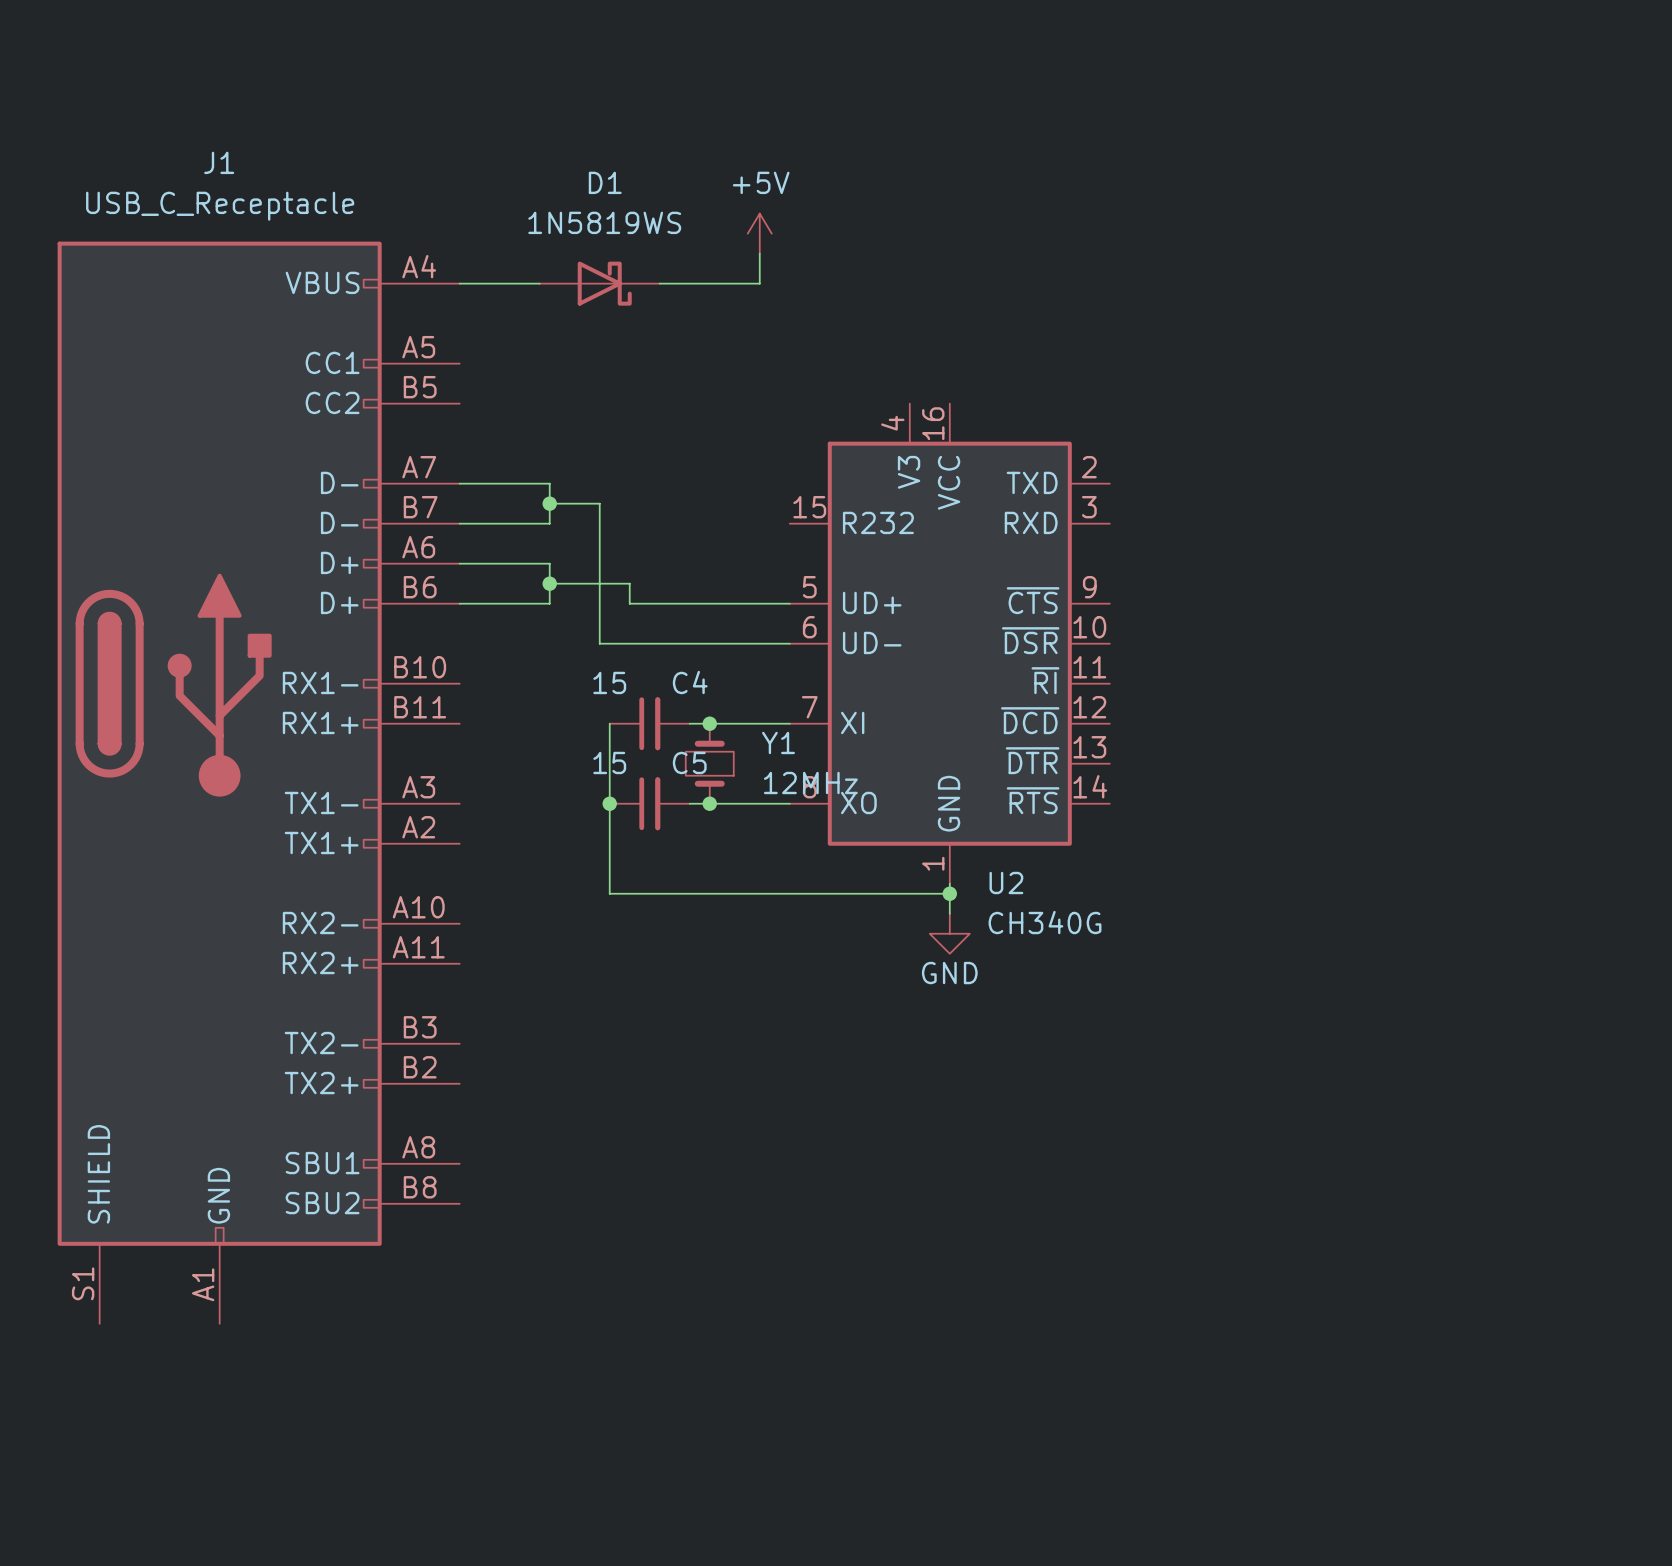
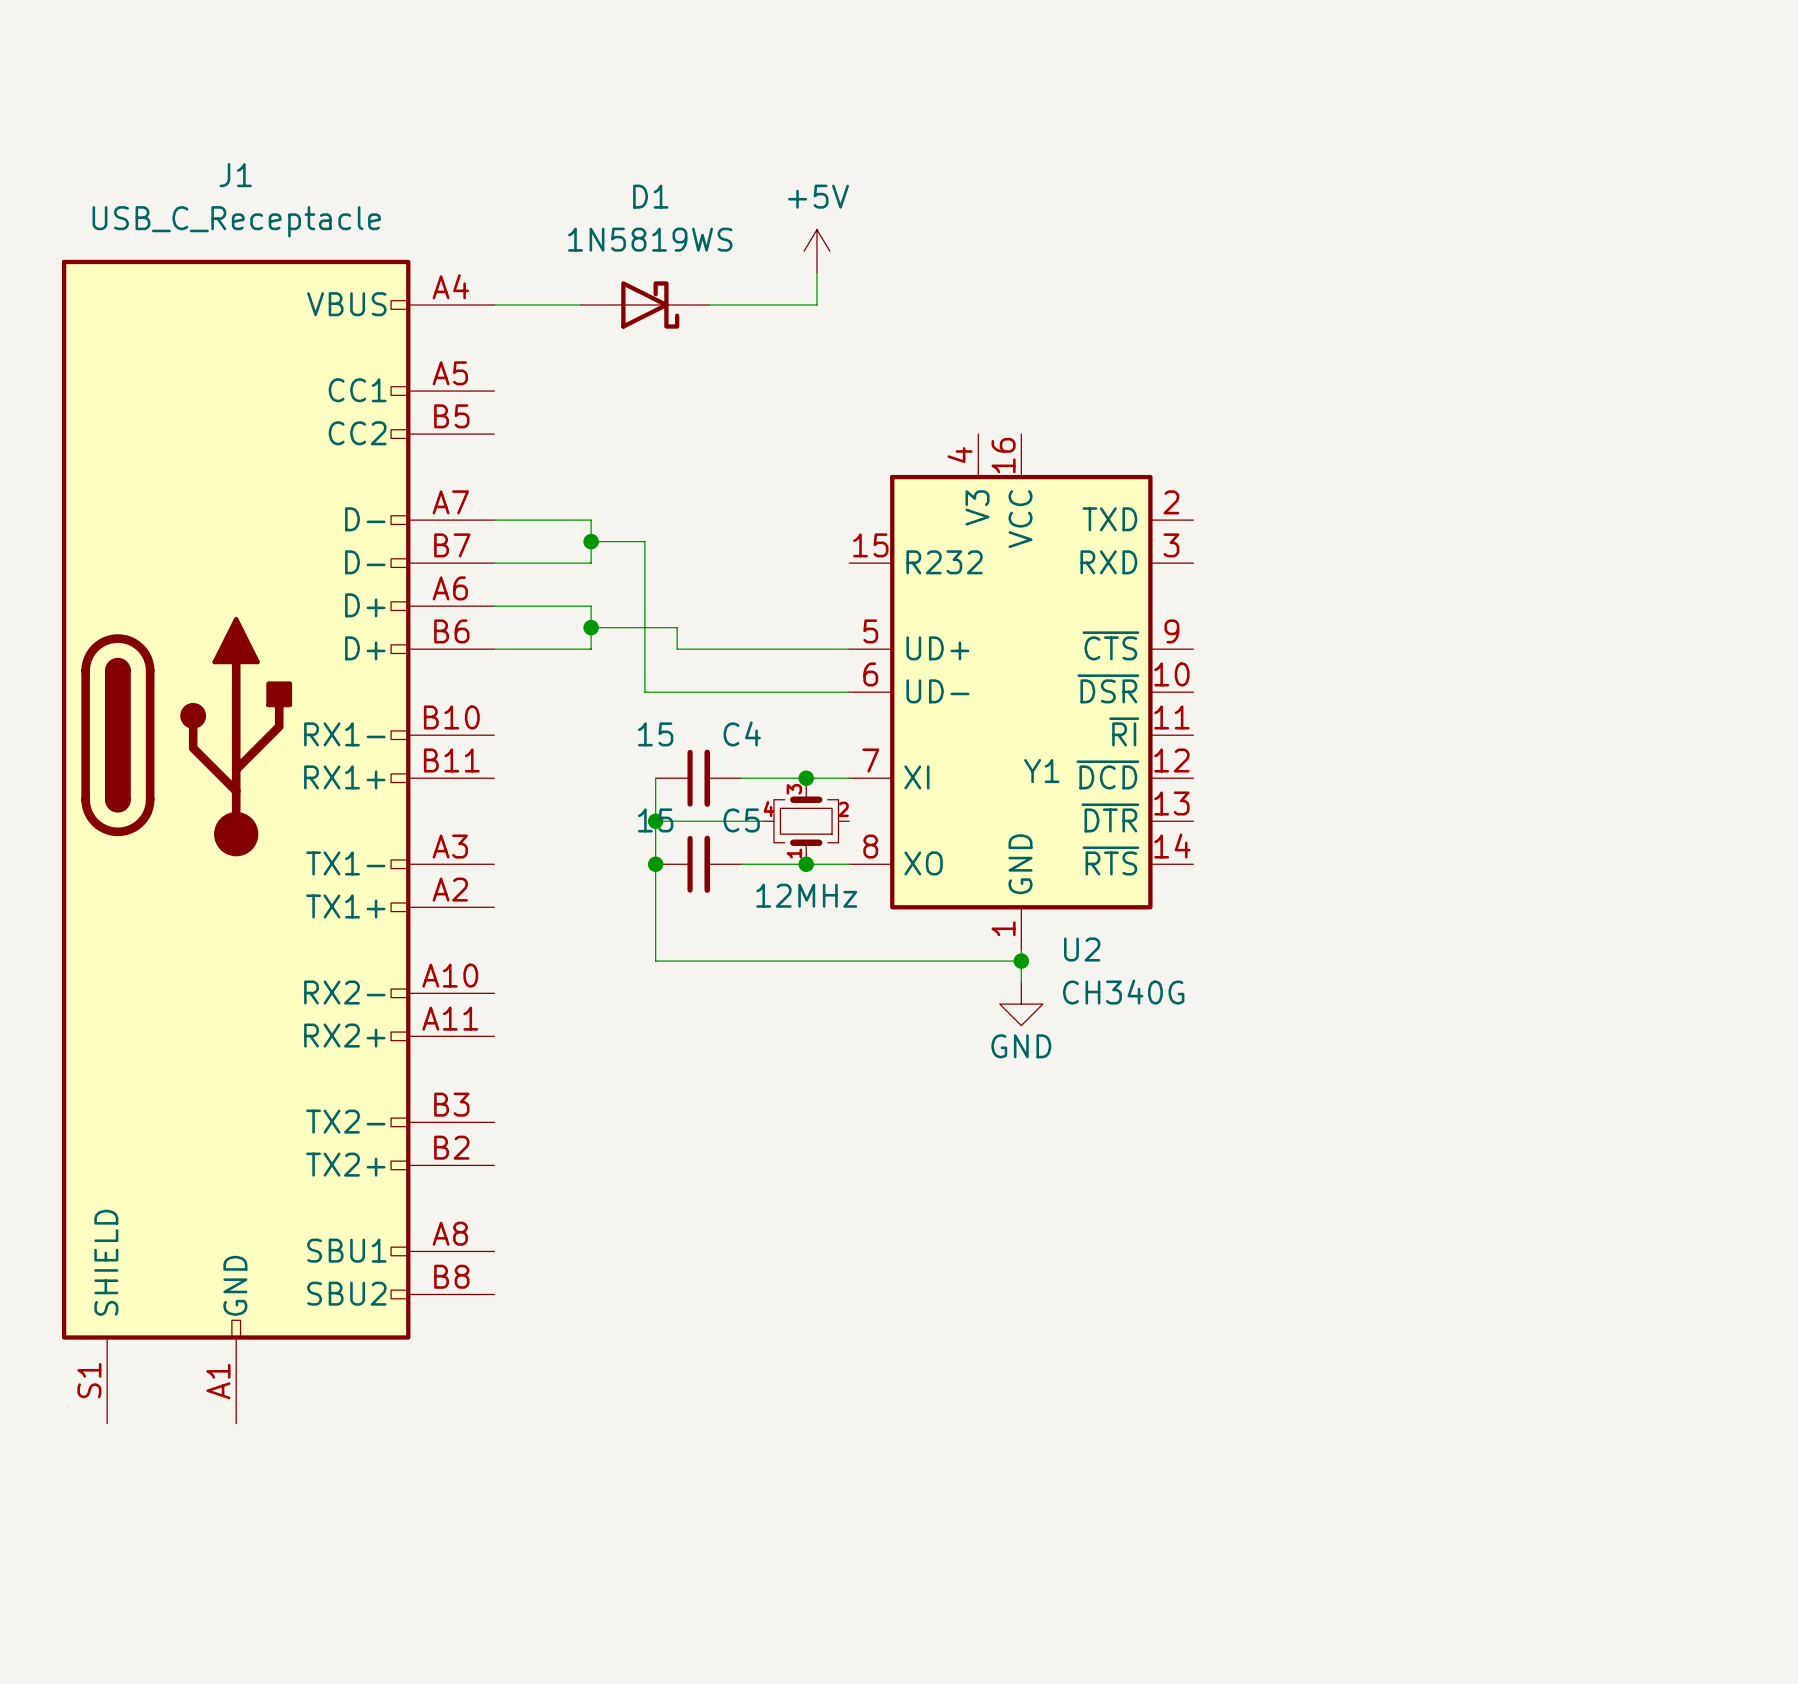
Y1 symbol: [685, 723, 734, 804] -> [763, 778, 850, 865]
junction position: (709, 723) -> (806, 778)
Y1 name position: Y1 (778, 742) -> Y1 (1041, 771)
wire: none -> (655, 821) (763, 821)
junction: none -> (655, 821)
Y1 value position: 12MHz (810, 782) -> 12MHz (806, 895)
junction position: (709, 803) -> (806, 864)

